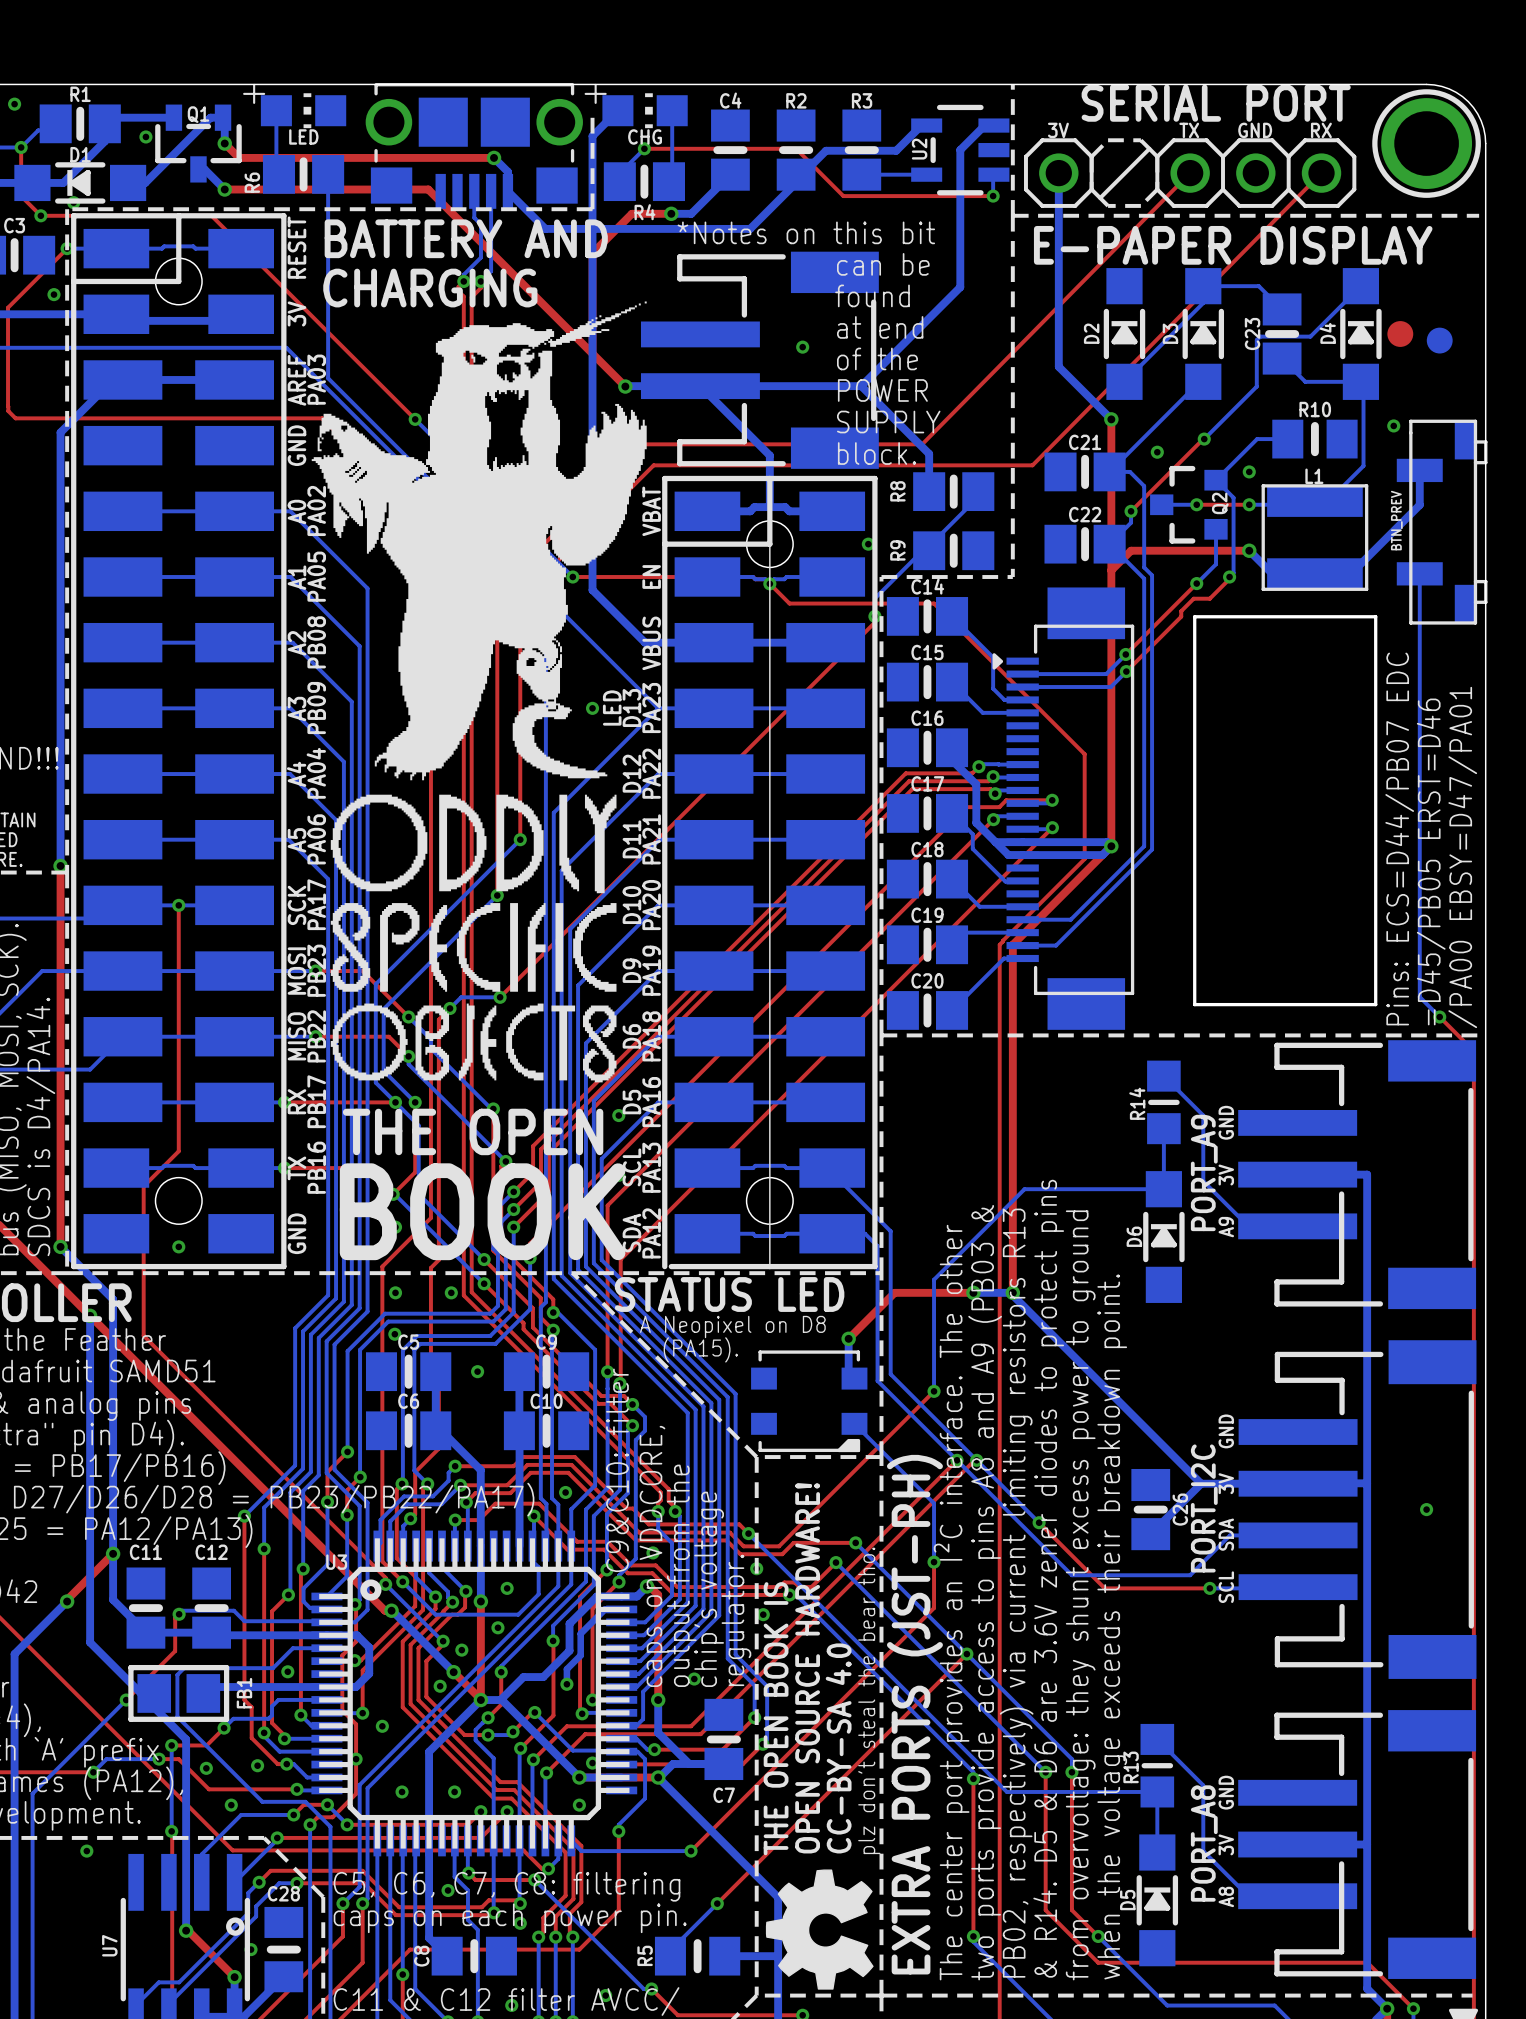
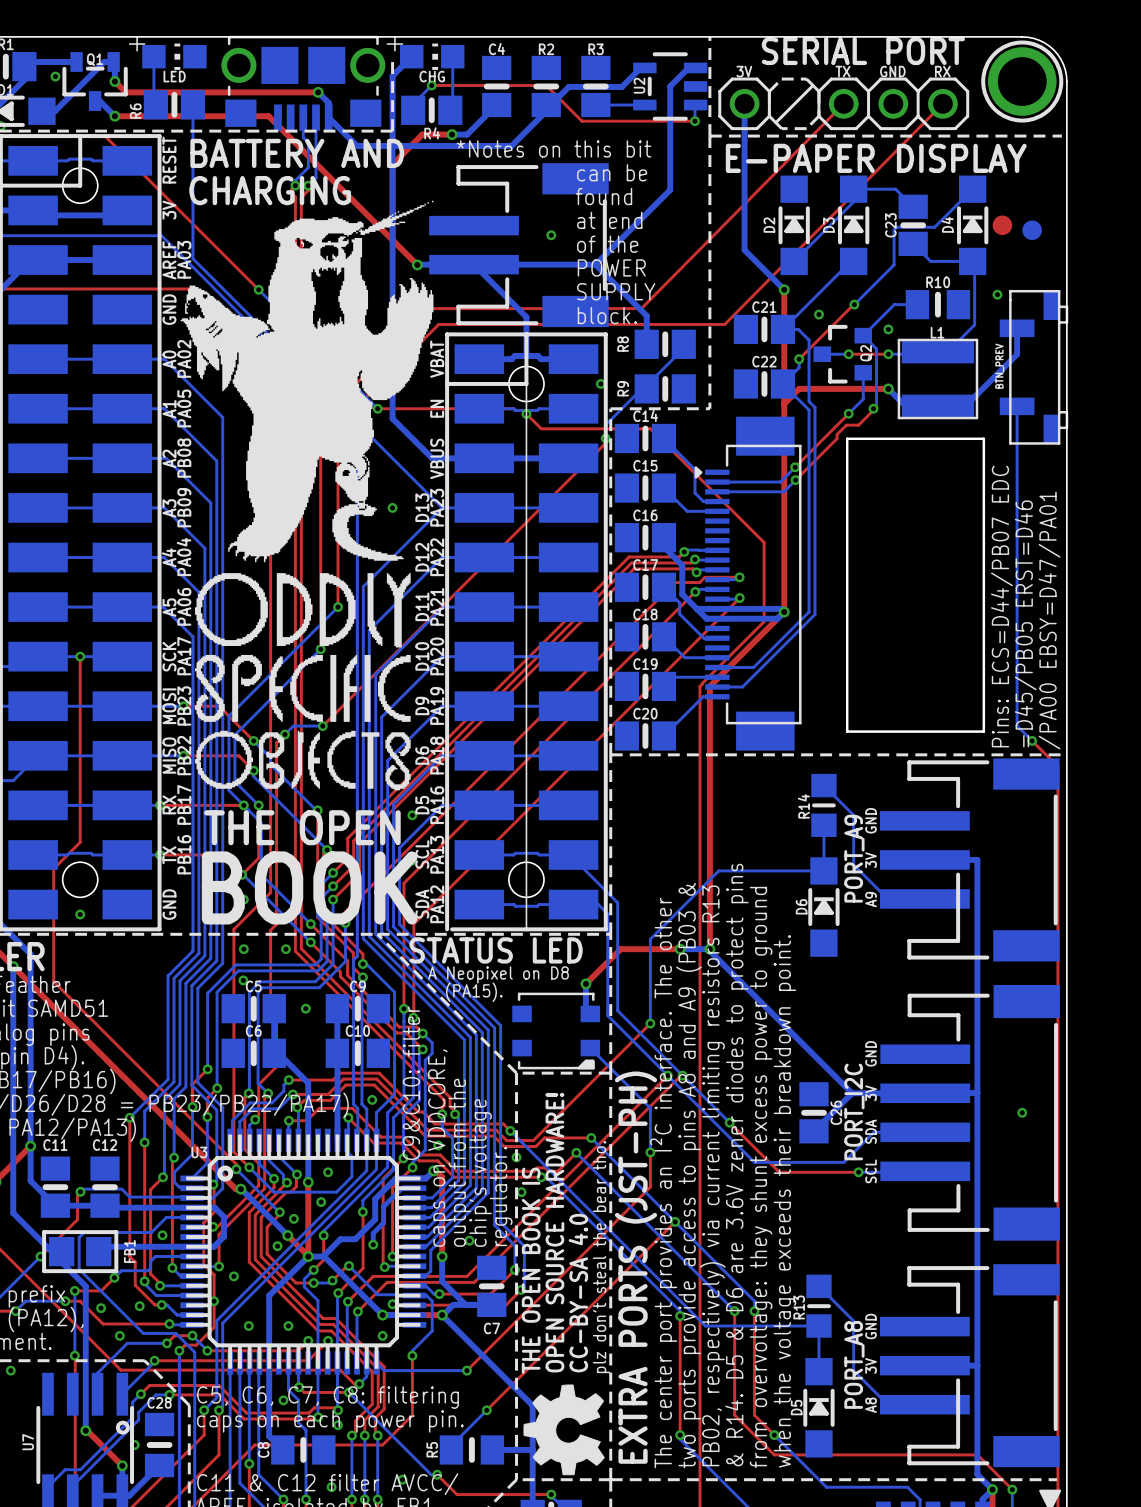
text: LED (612, 708) -> none

